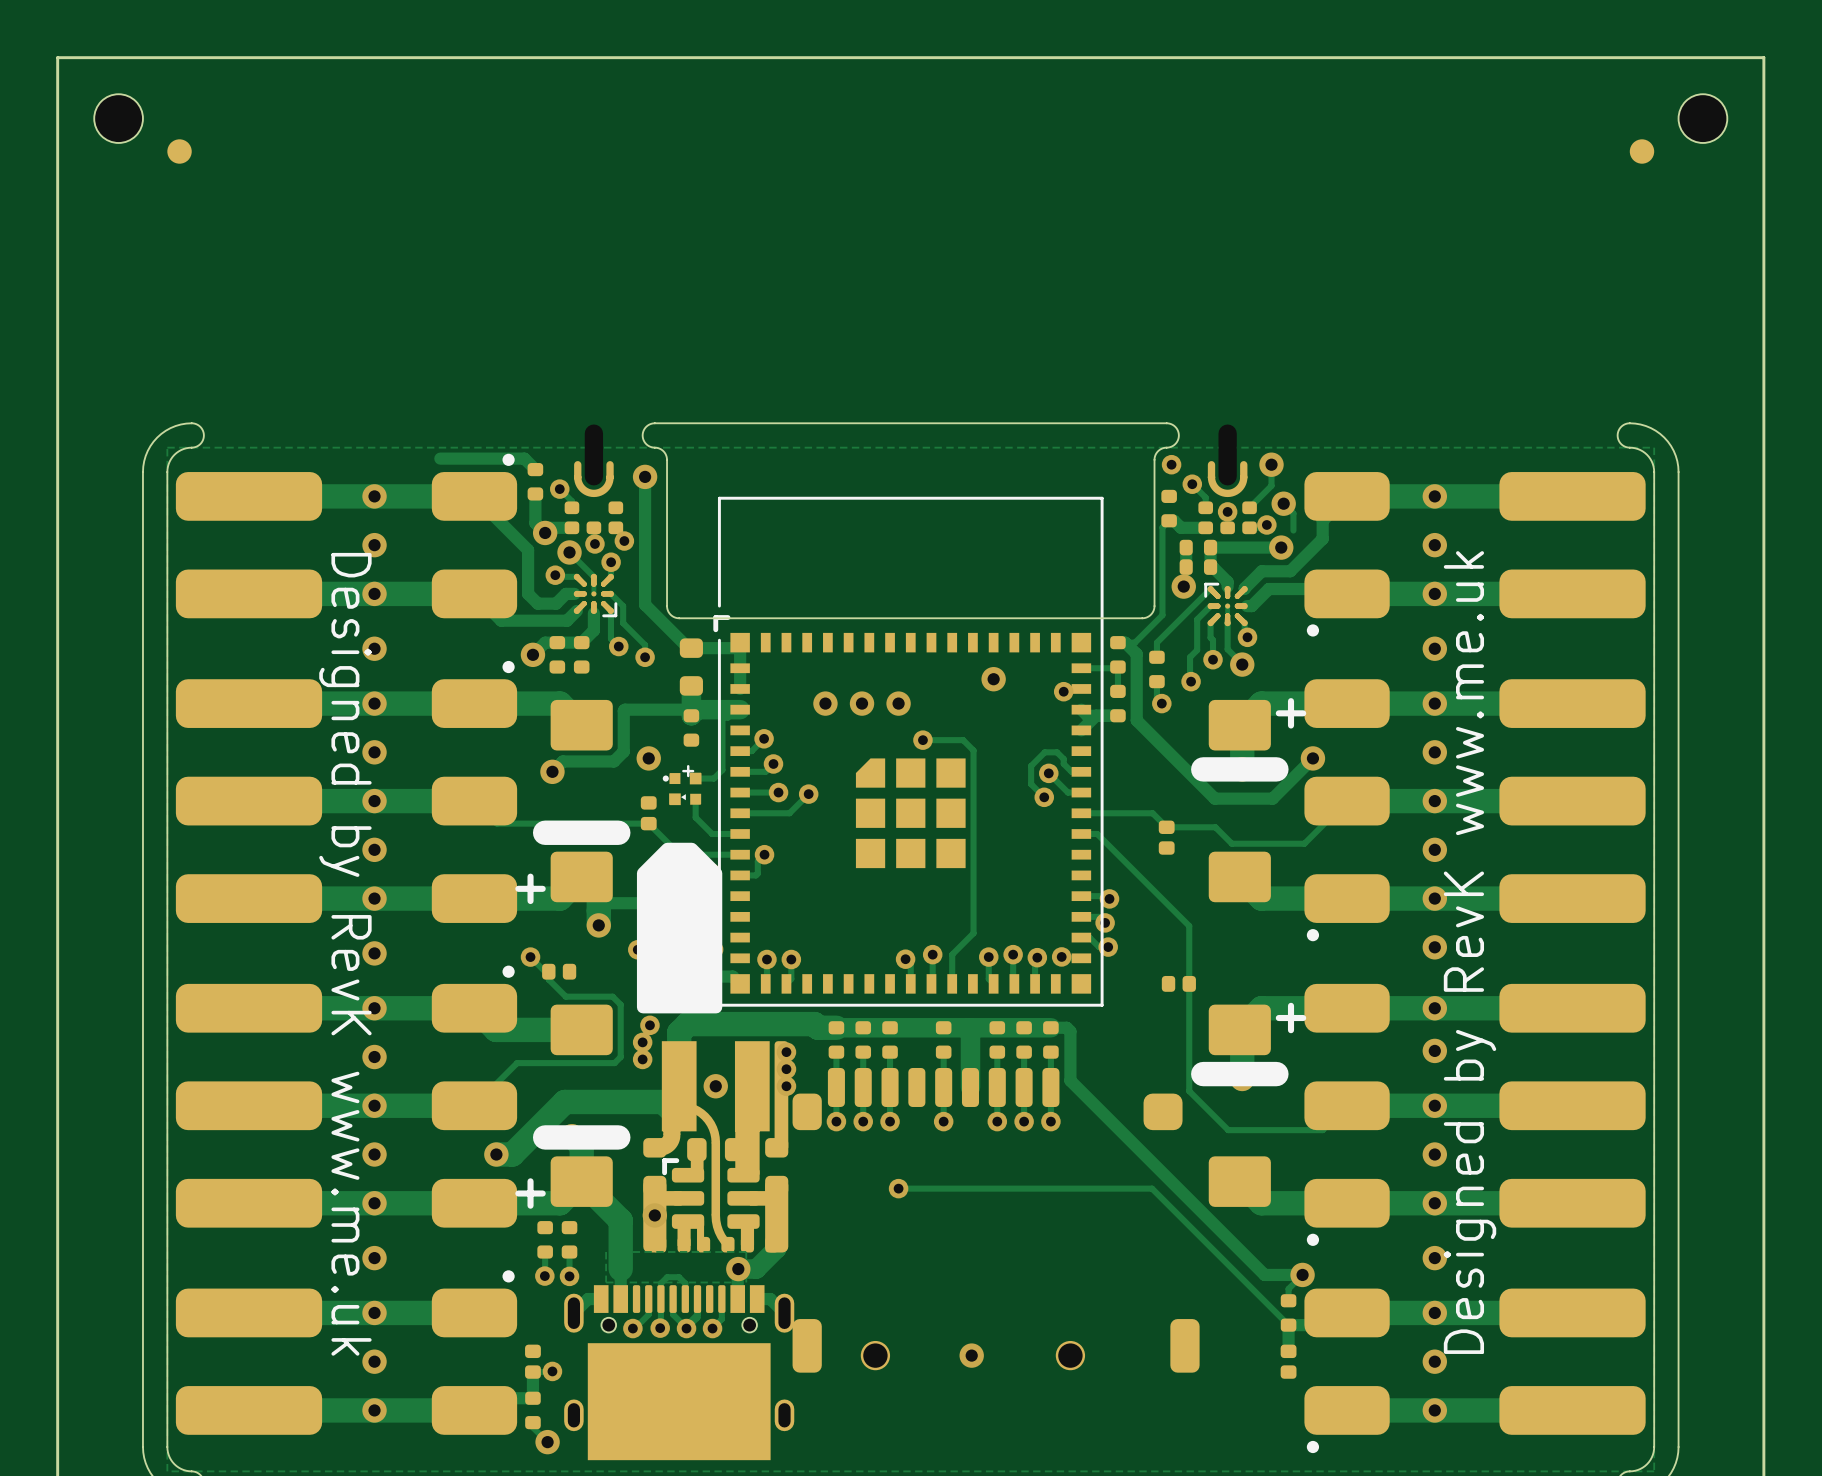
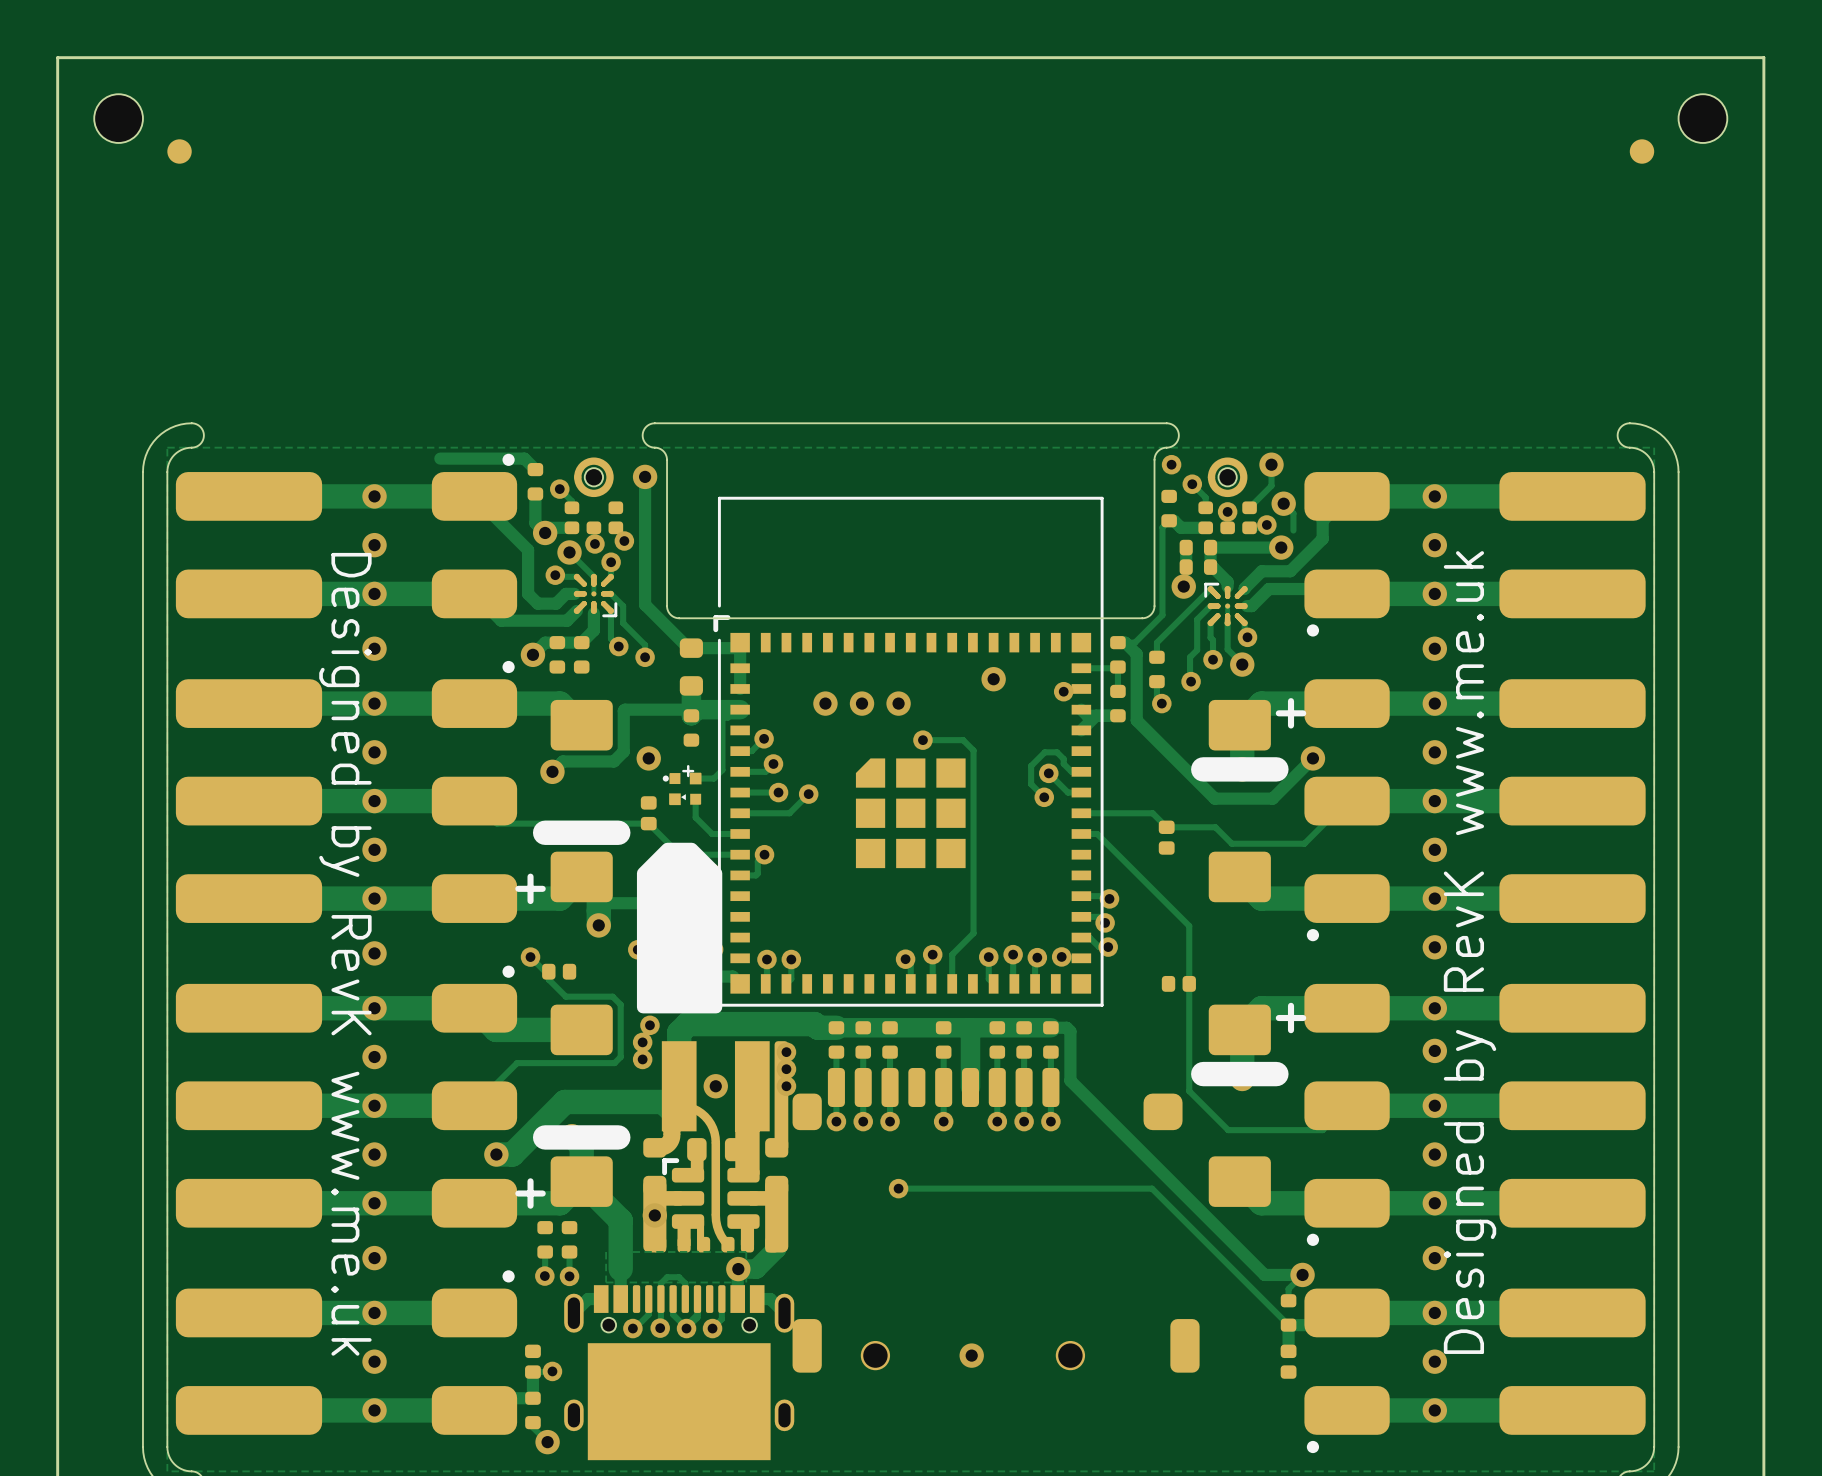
part footprint: [564, 424, 624, 535] -> [564, 457, 624, 535]
part footprint: [1198, 424, 1257, 535] -> [1198, 457, 1257, 535]

